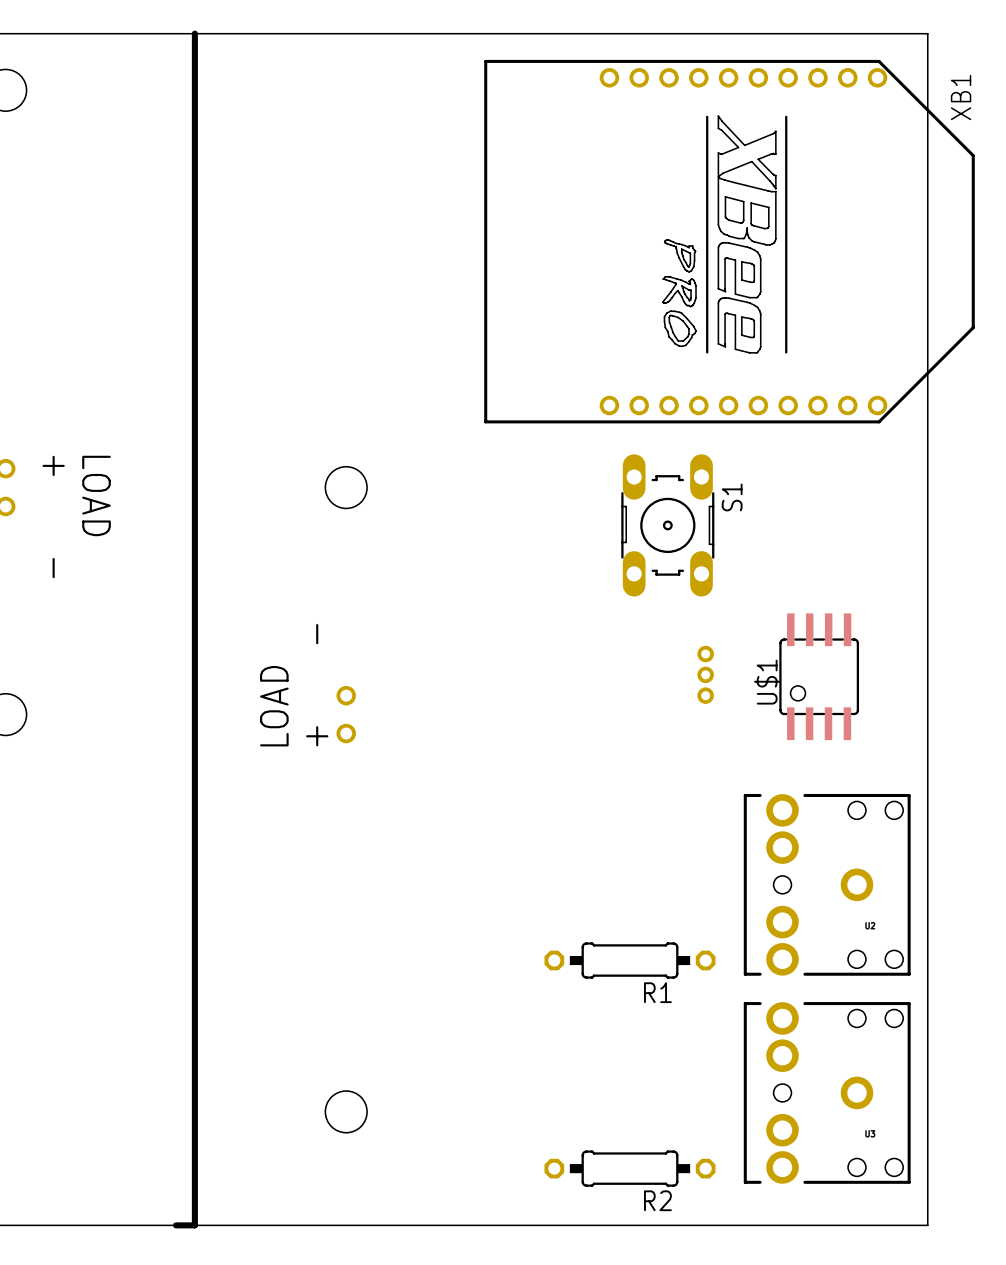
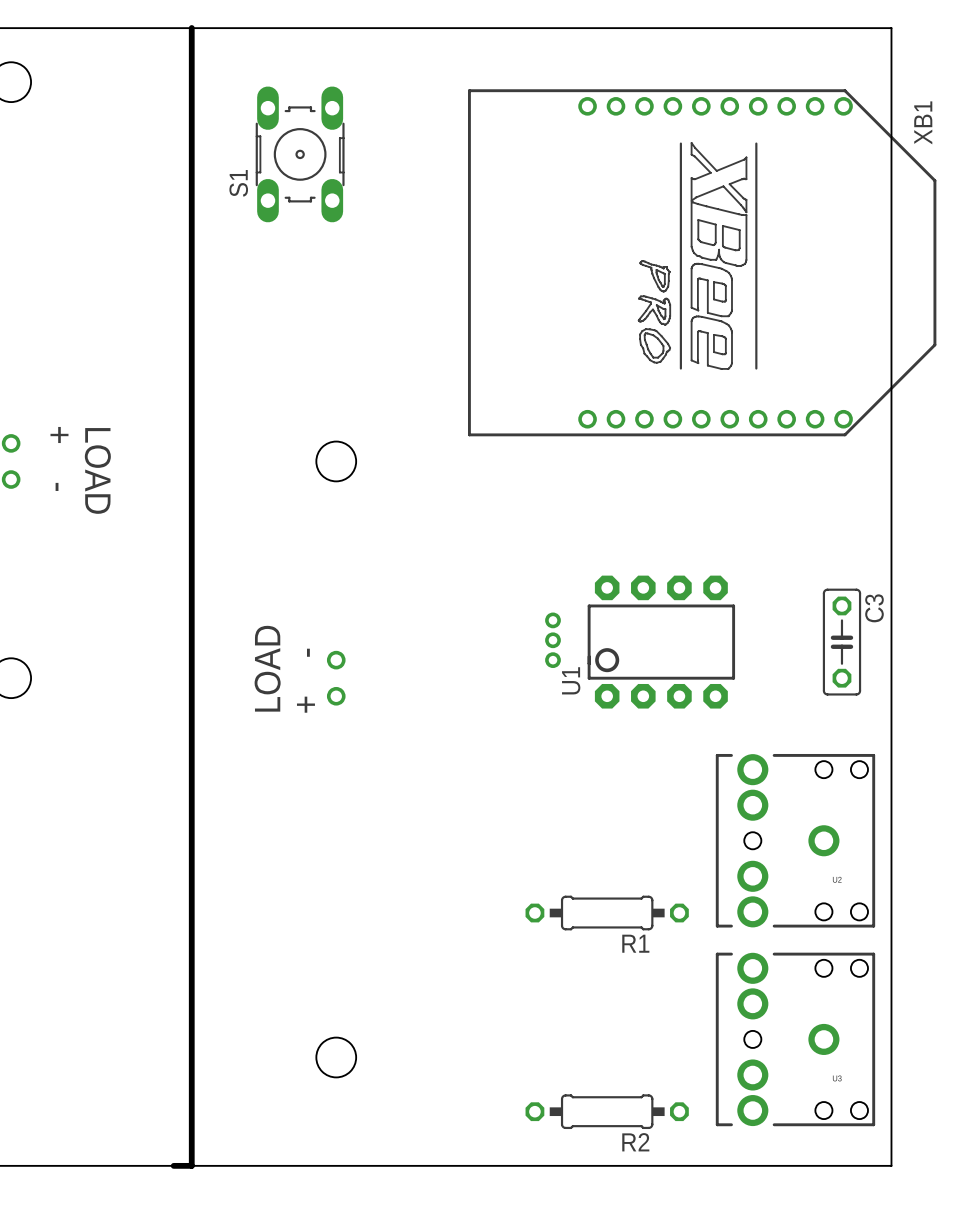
XB1 position: (729, 241) -> (702, 262)
S1 rotation: 0° (667, 525) -> 180° (300, 154)
S1 position: (667, 525) -> (300, 154)
part position: (705, 674) -> (552, 640)
U1: none -> (661, 642)
U$1: (819, 676) -> none
C3: none -> (841, 642)

